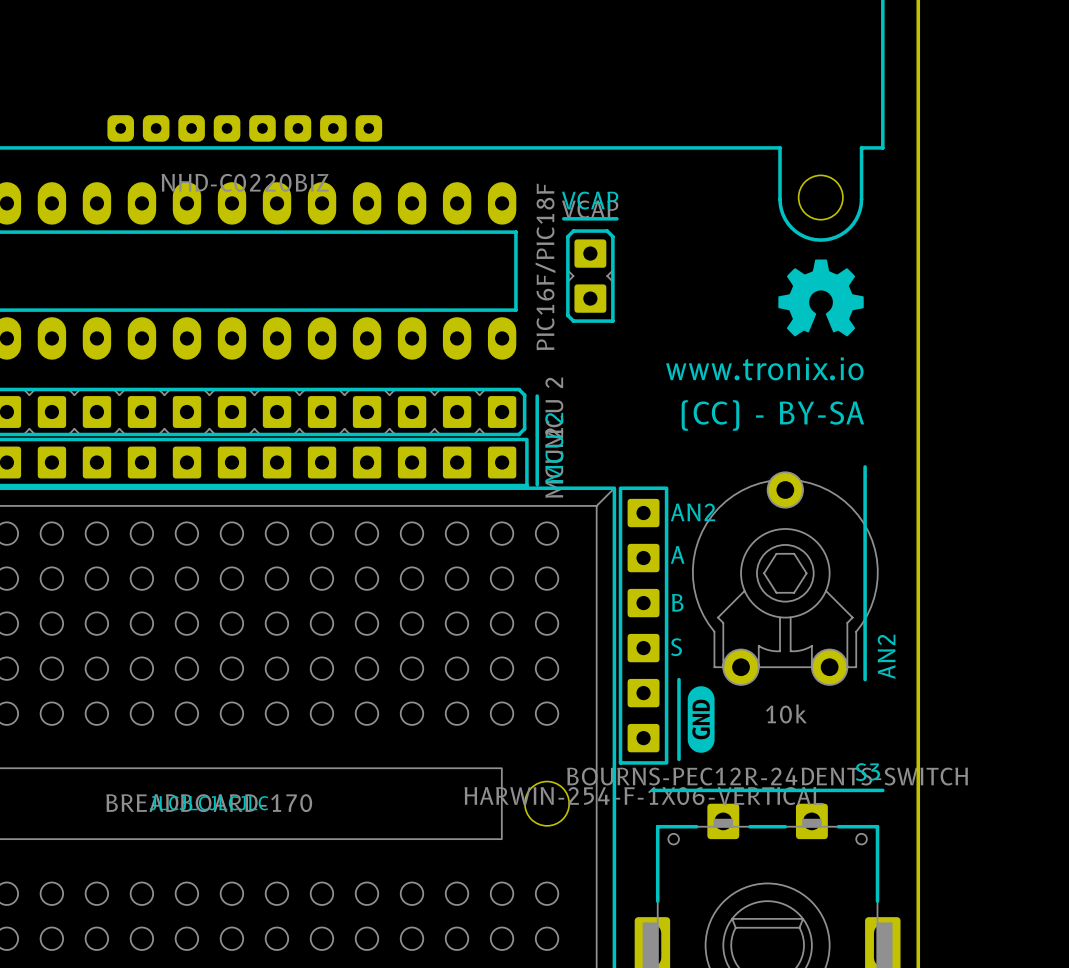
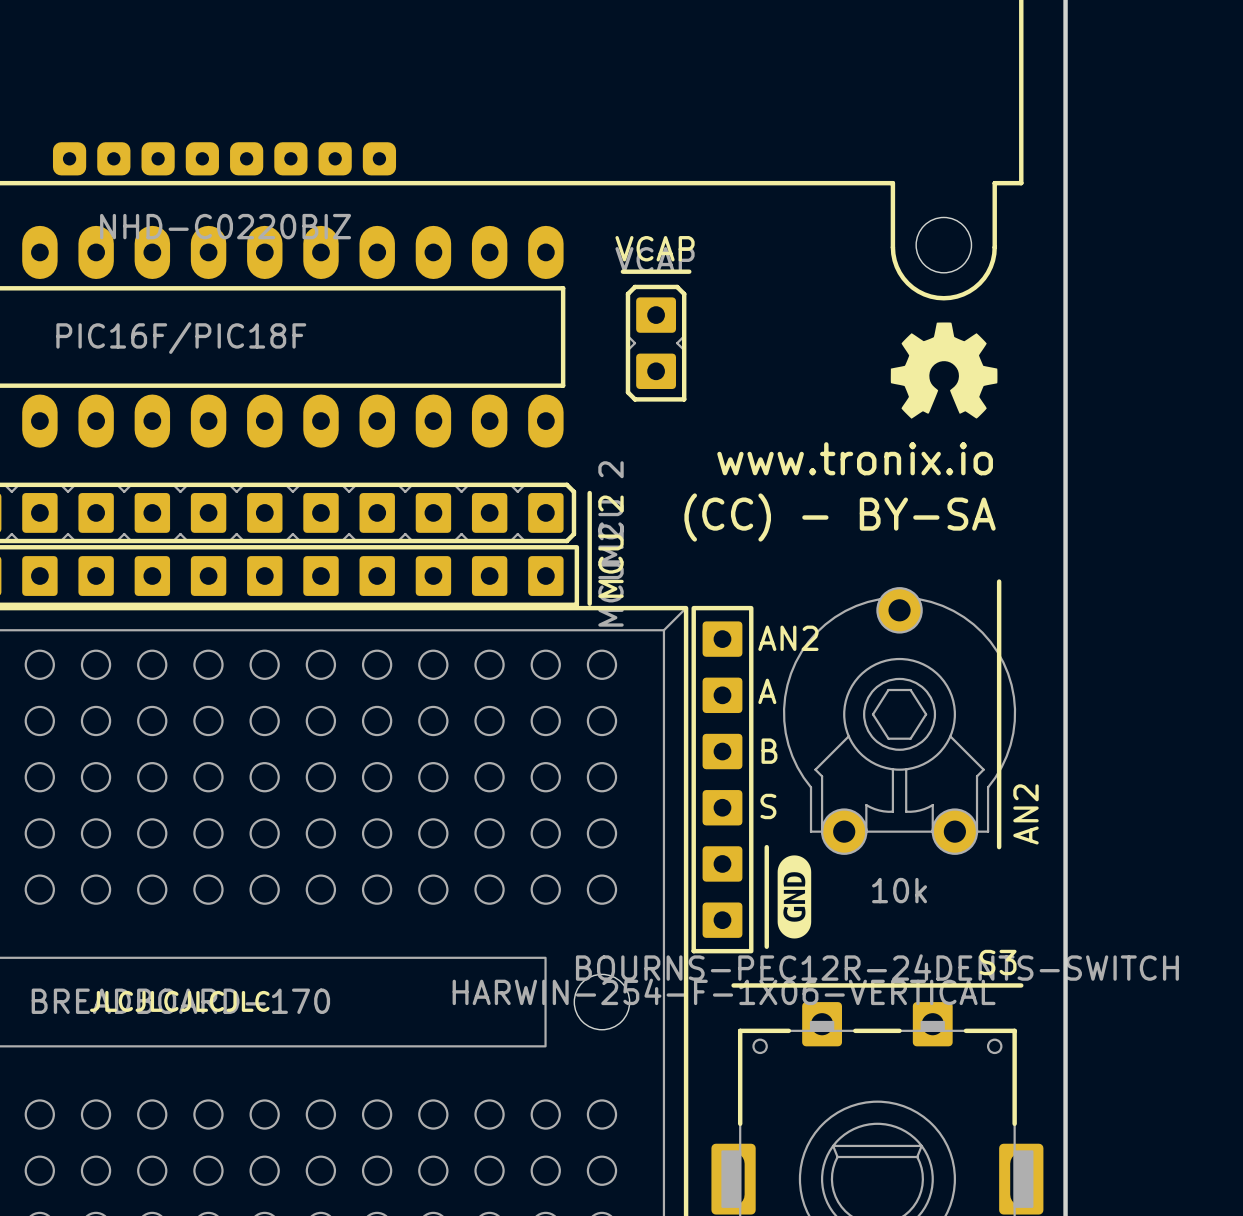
part value rotation: 0° (545, 266) -> 90° clockwise (181, 338)
part value position: PIC16F/PIC18F (545, 266) -> PIC16F/PIC18F (181, 338)

